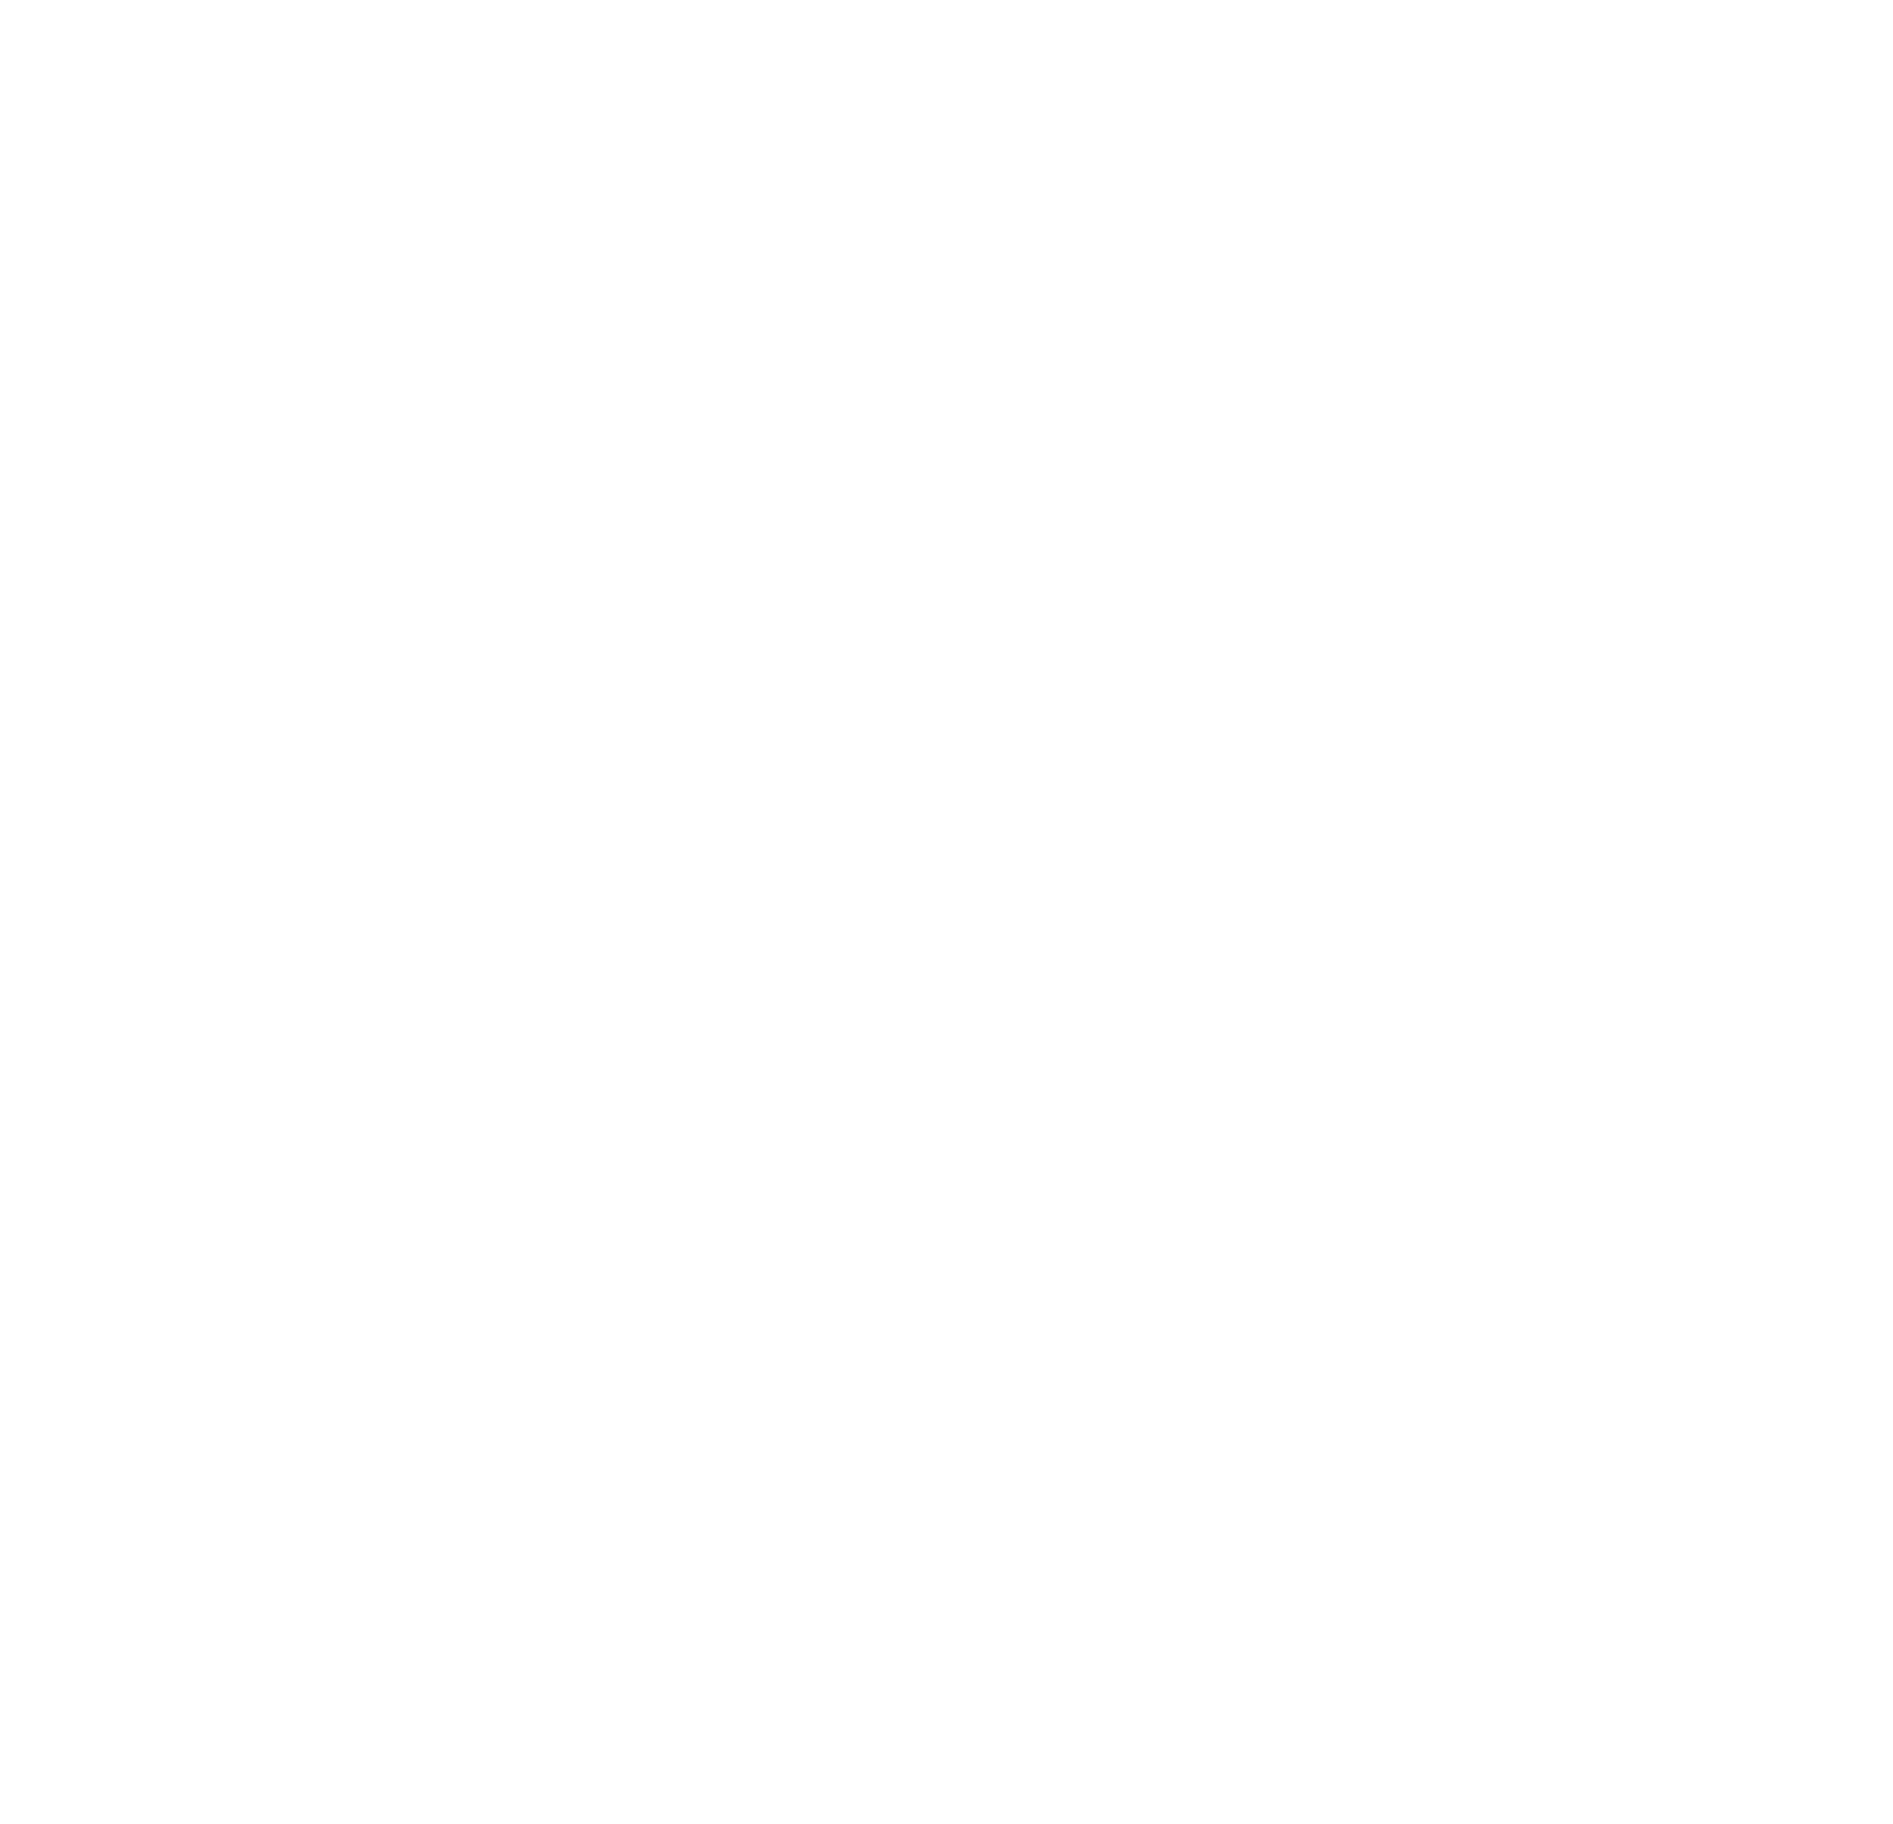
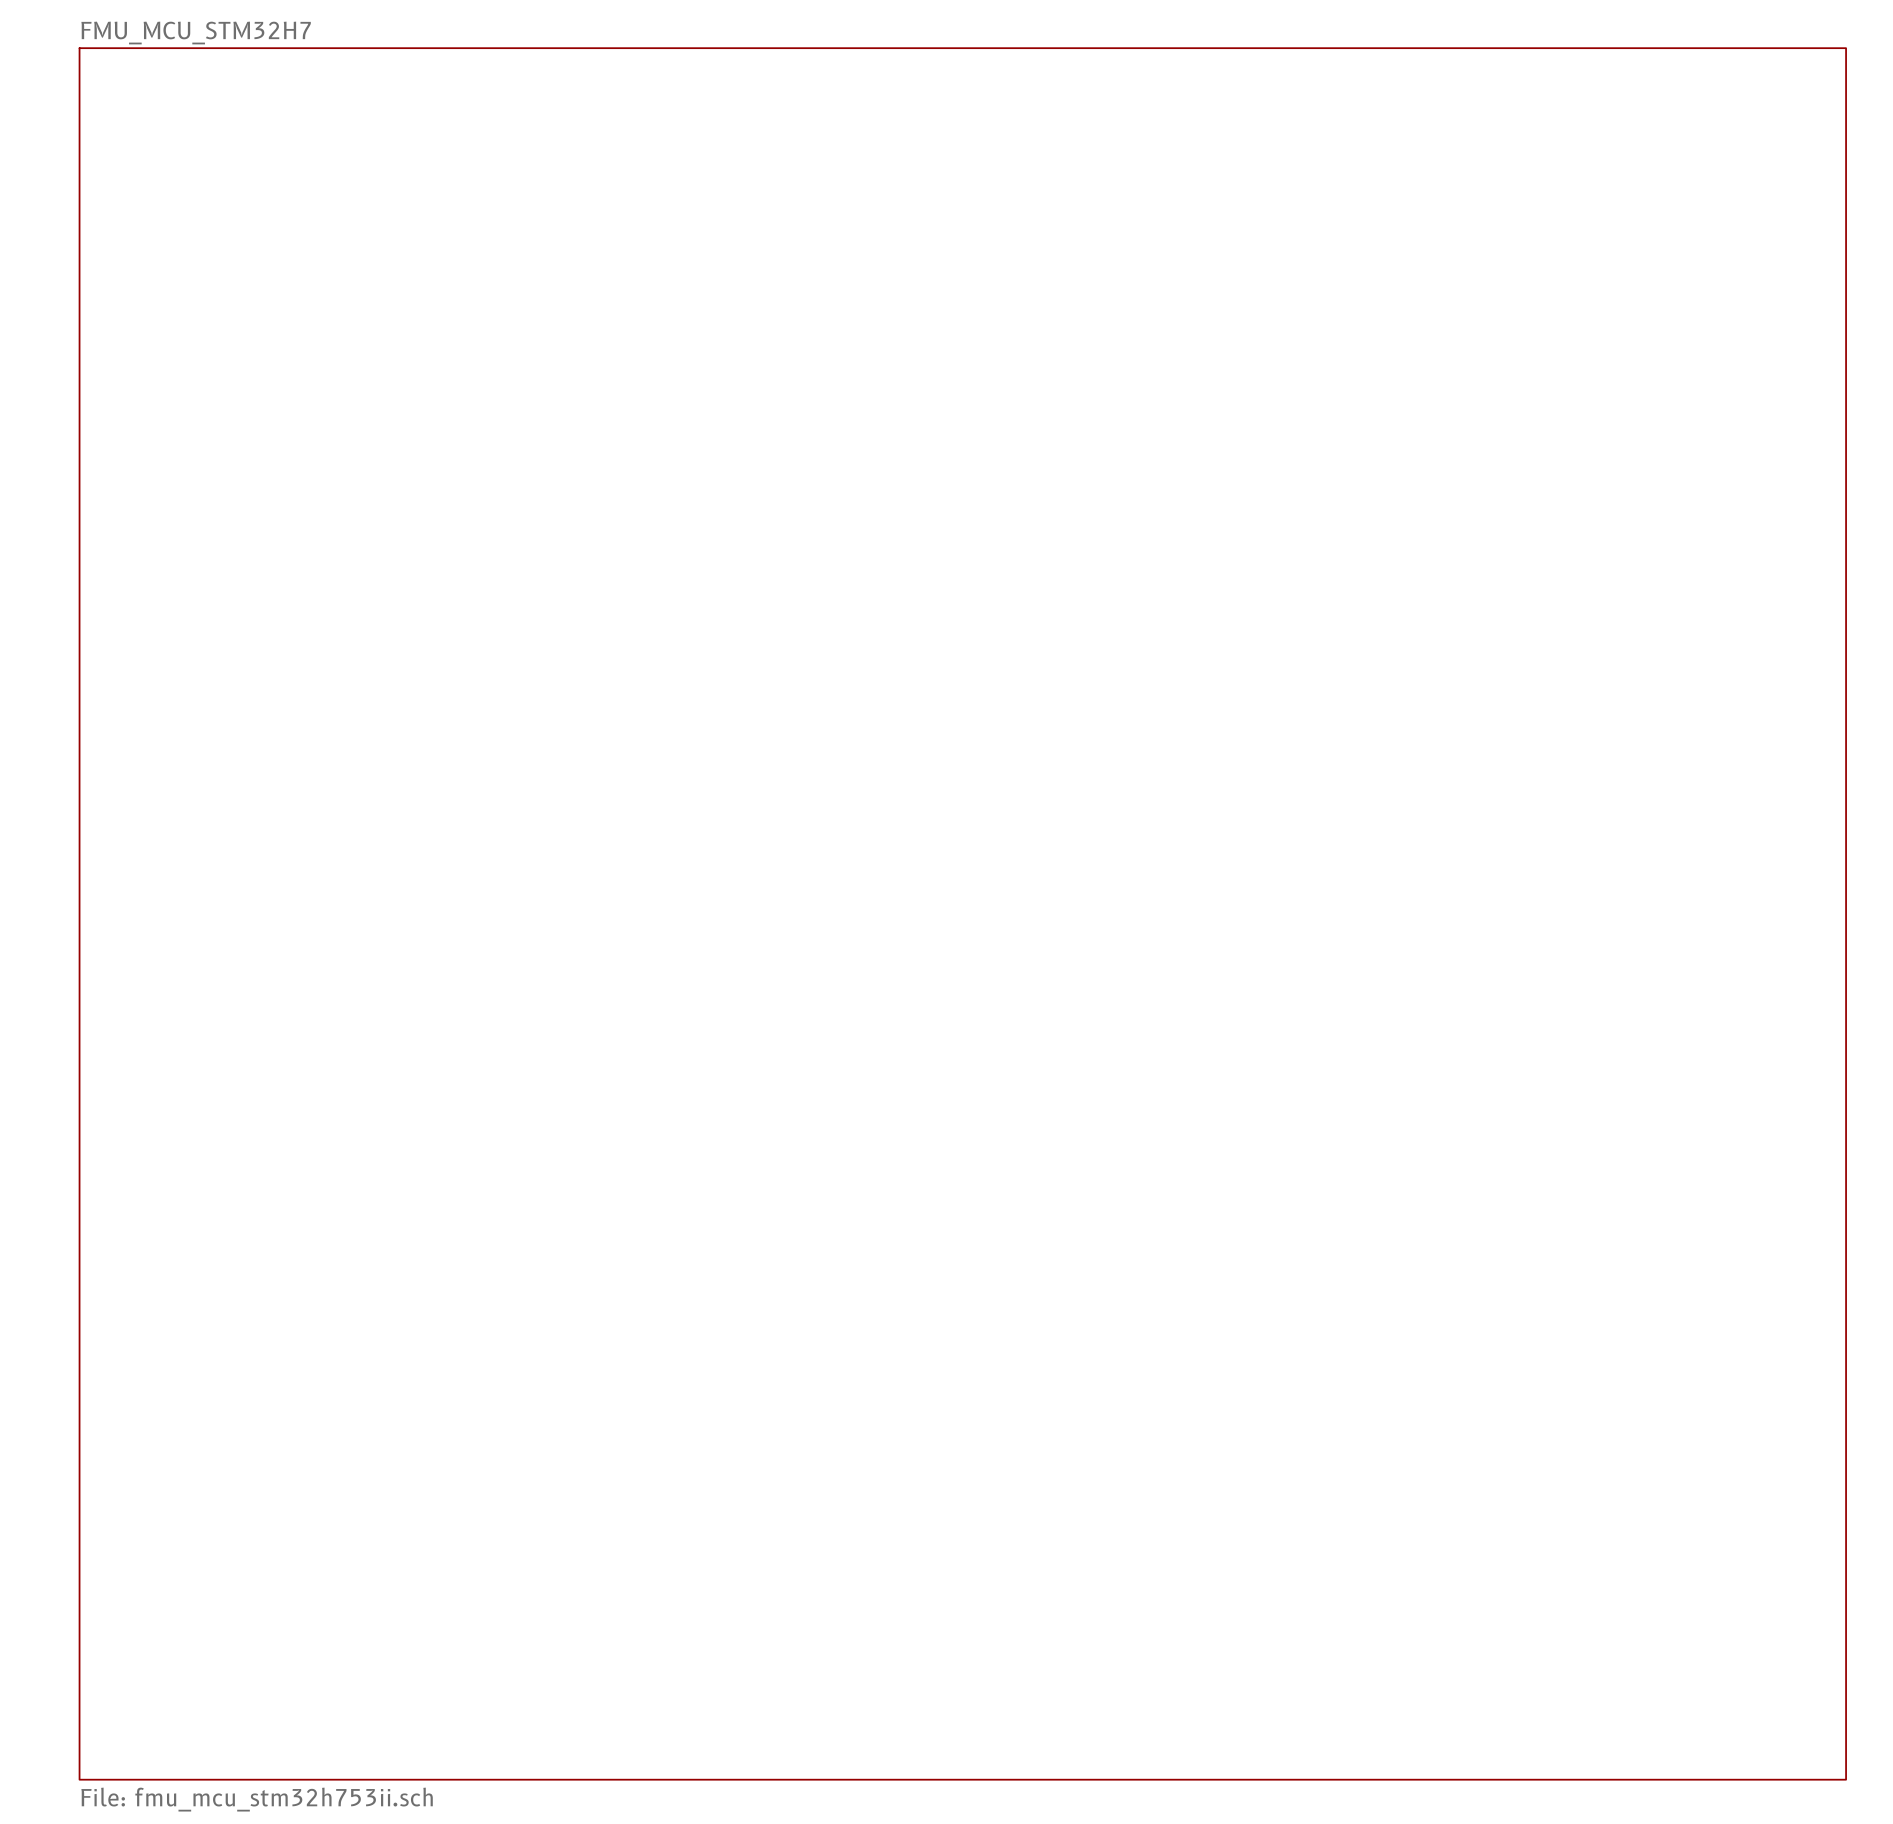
sheet FMU_MCU_STM32H7: none -> File: fmu_mcu_stm32h753ii.sch (962, 913)

